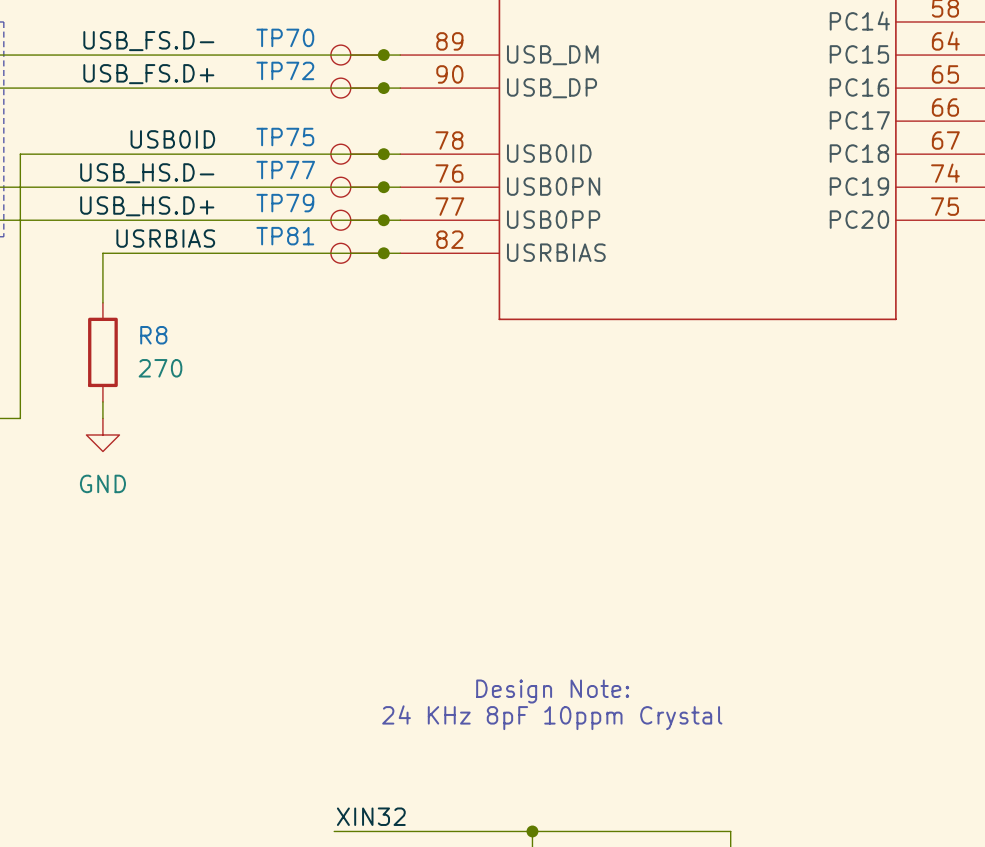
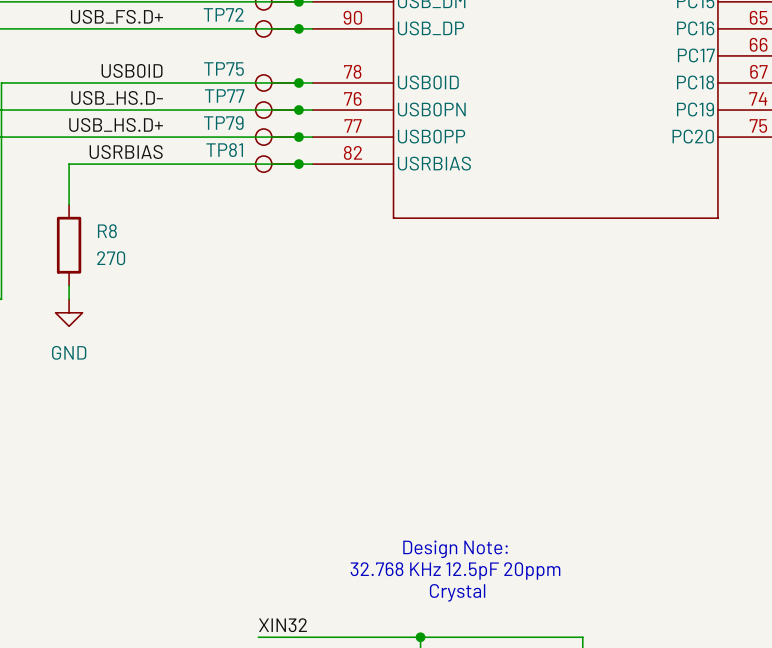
text position: Design Note: (552, 691) -> Design Note: (455, 549)
text: 24 KHz 8pF 10ppm Crystal (552, 717) -> none
text: none -> 32.768 KHz 12.5pF 20ppm (455, 570)
text: none -> Crystal (457, 592)

